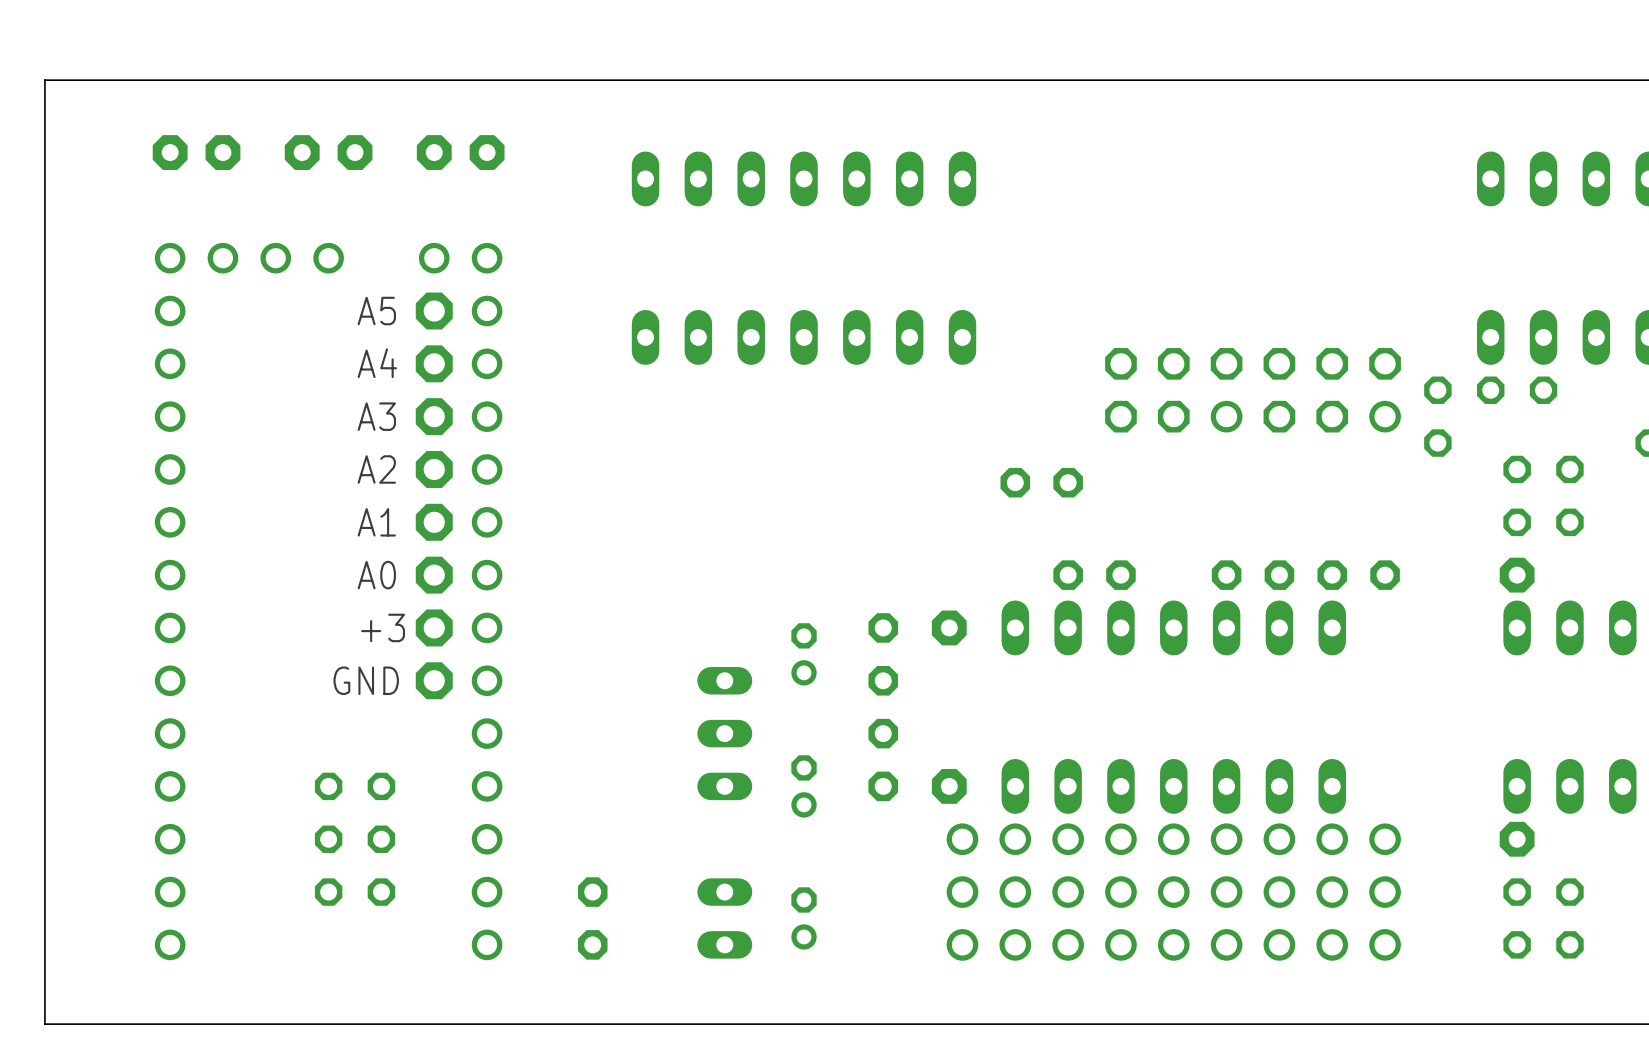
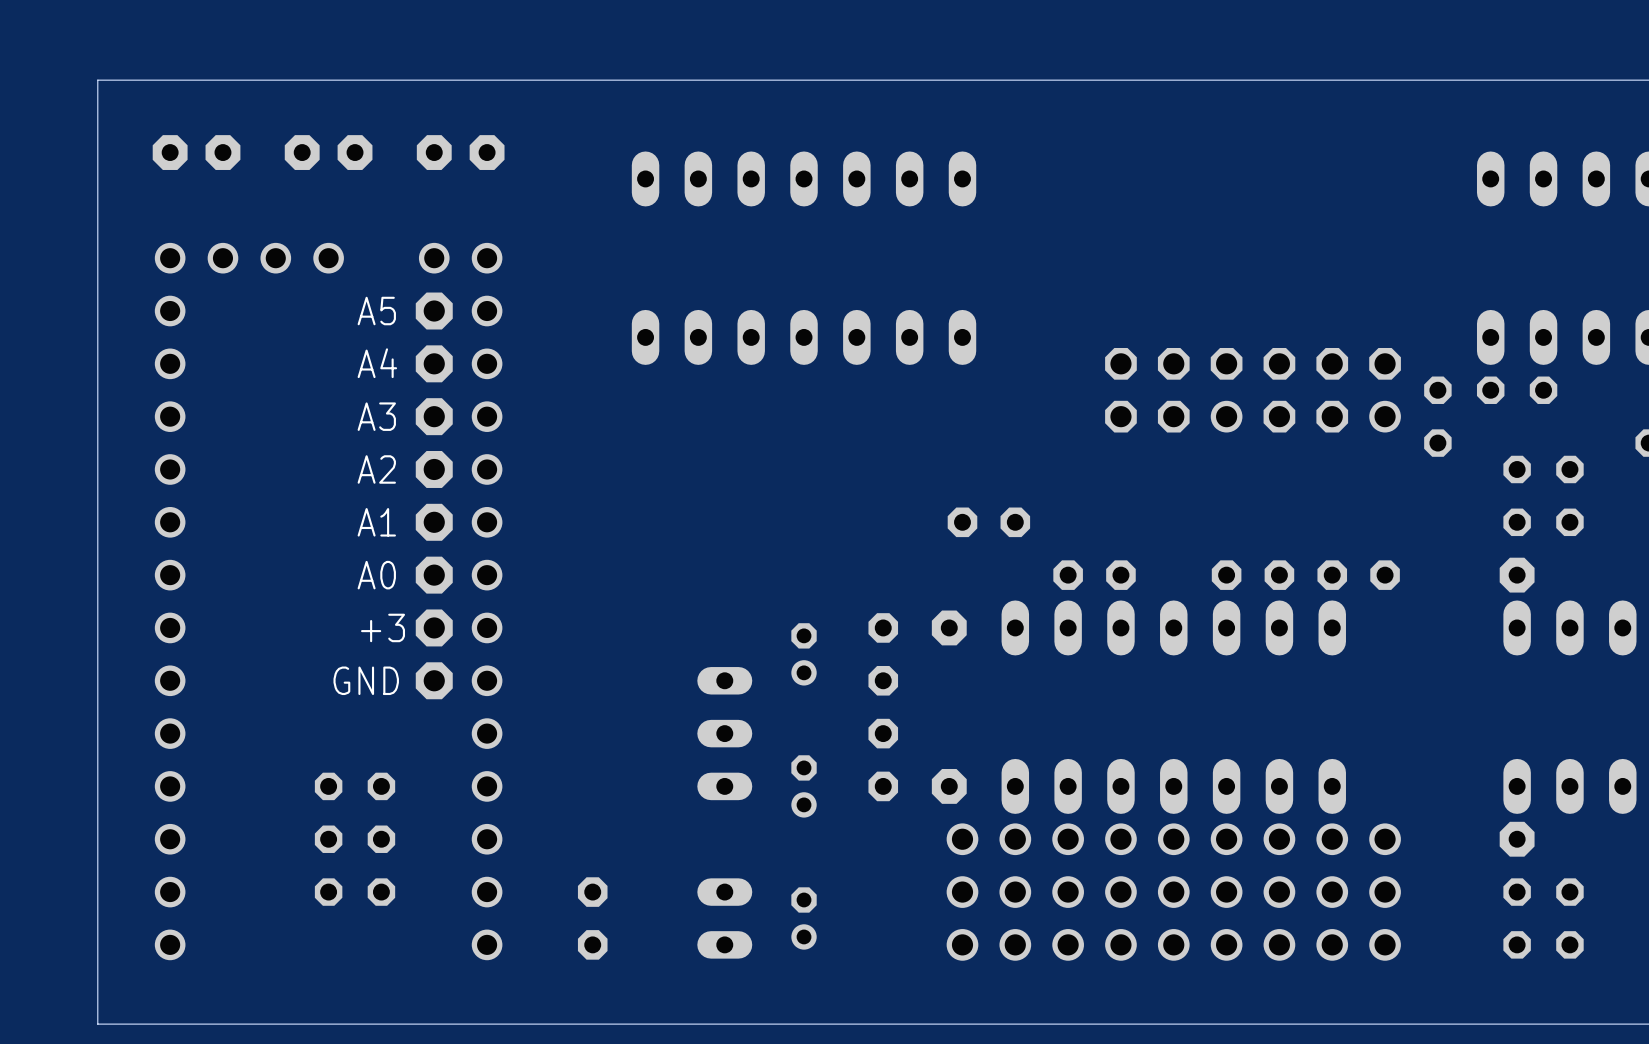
board edge: (97, 80) (44, 80) (44, 1024) (97, 1024) -> (97, 80) (97, 1024)
part position: (1041, 482) -> (988, 522)

